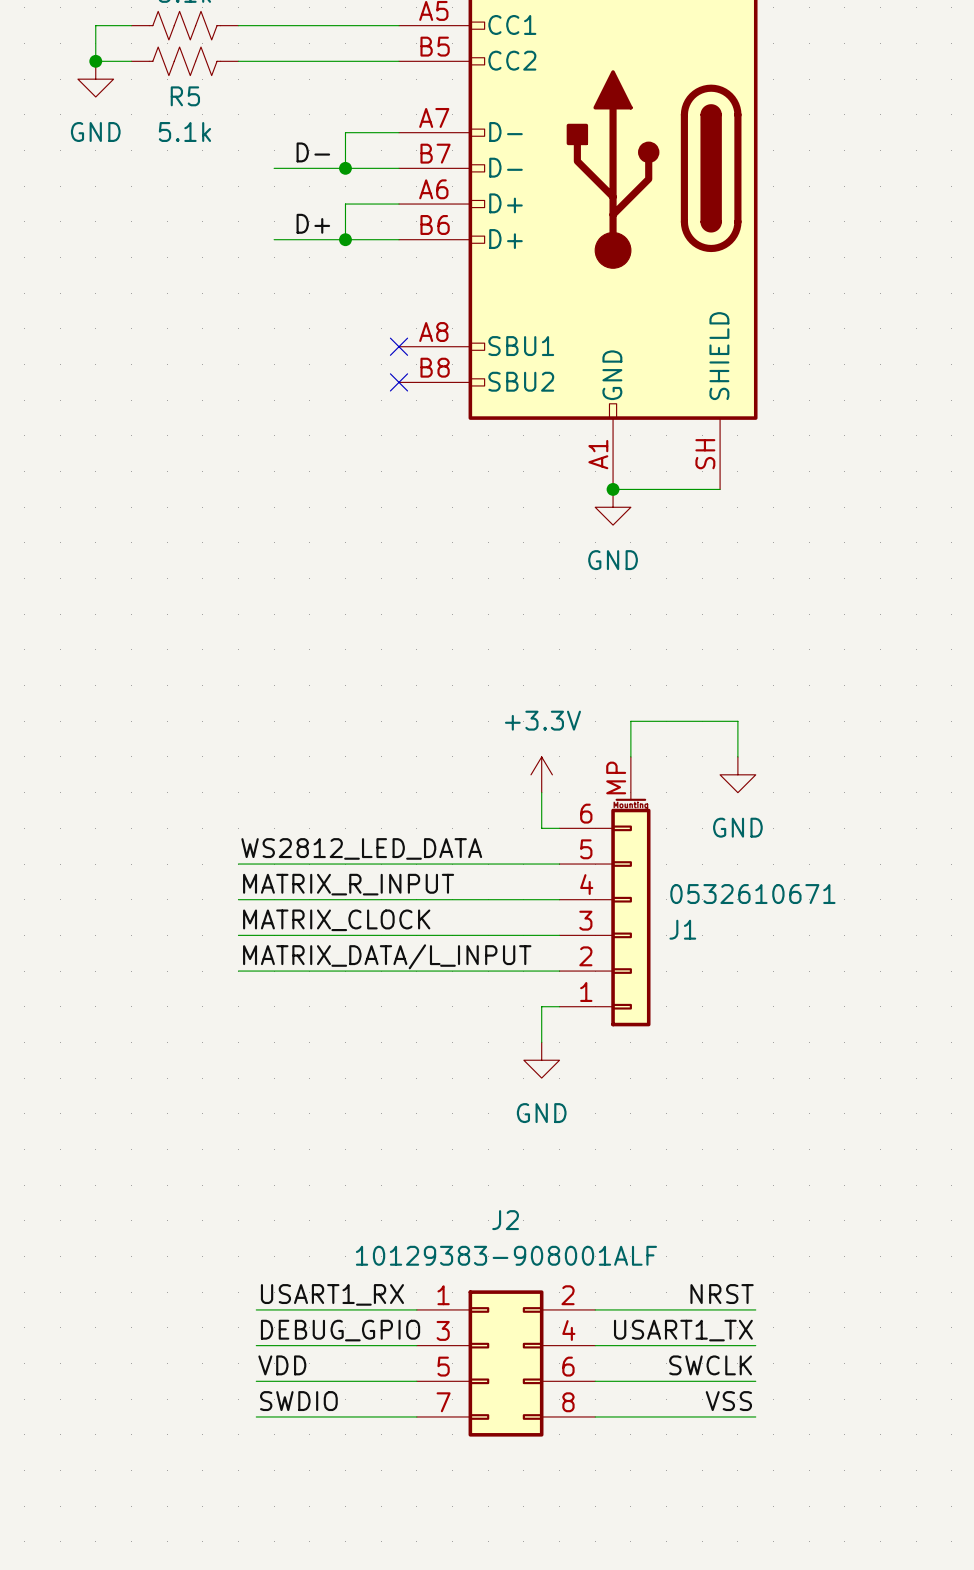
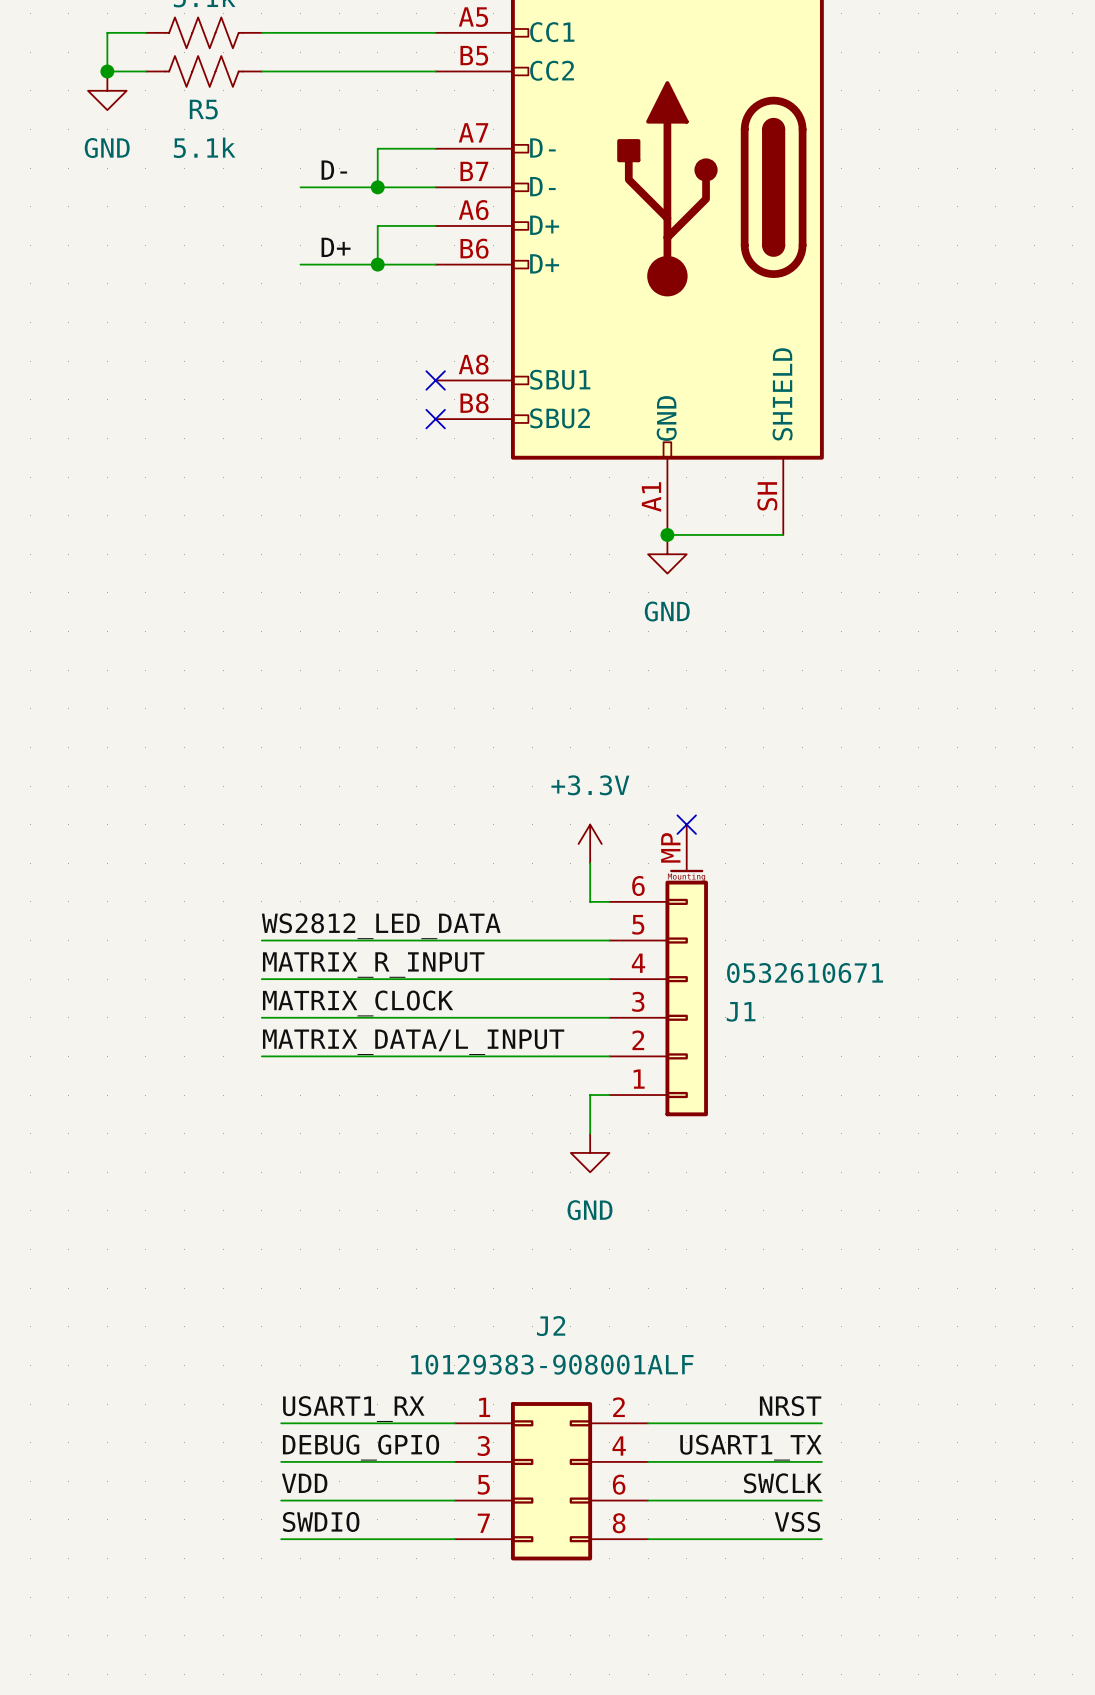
wire: (630, 756) (630, 721) (737, 721) (737, 756) -> none
no-connect mark: none -> (686, 824)
power symbol: GND (737, 774) -> none

